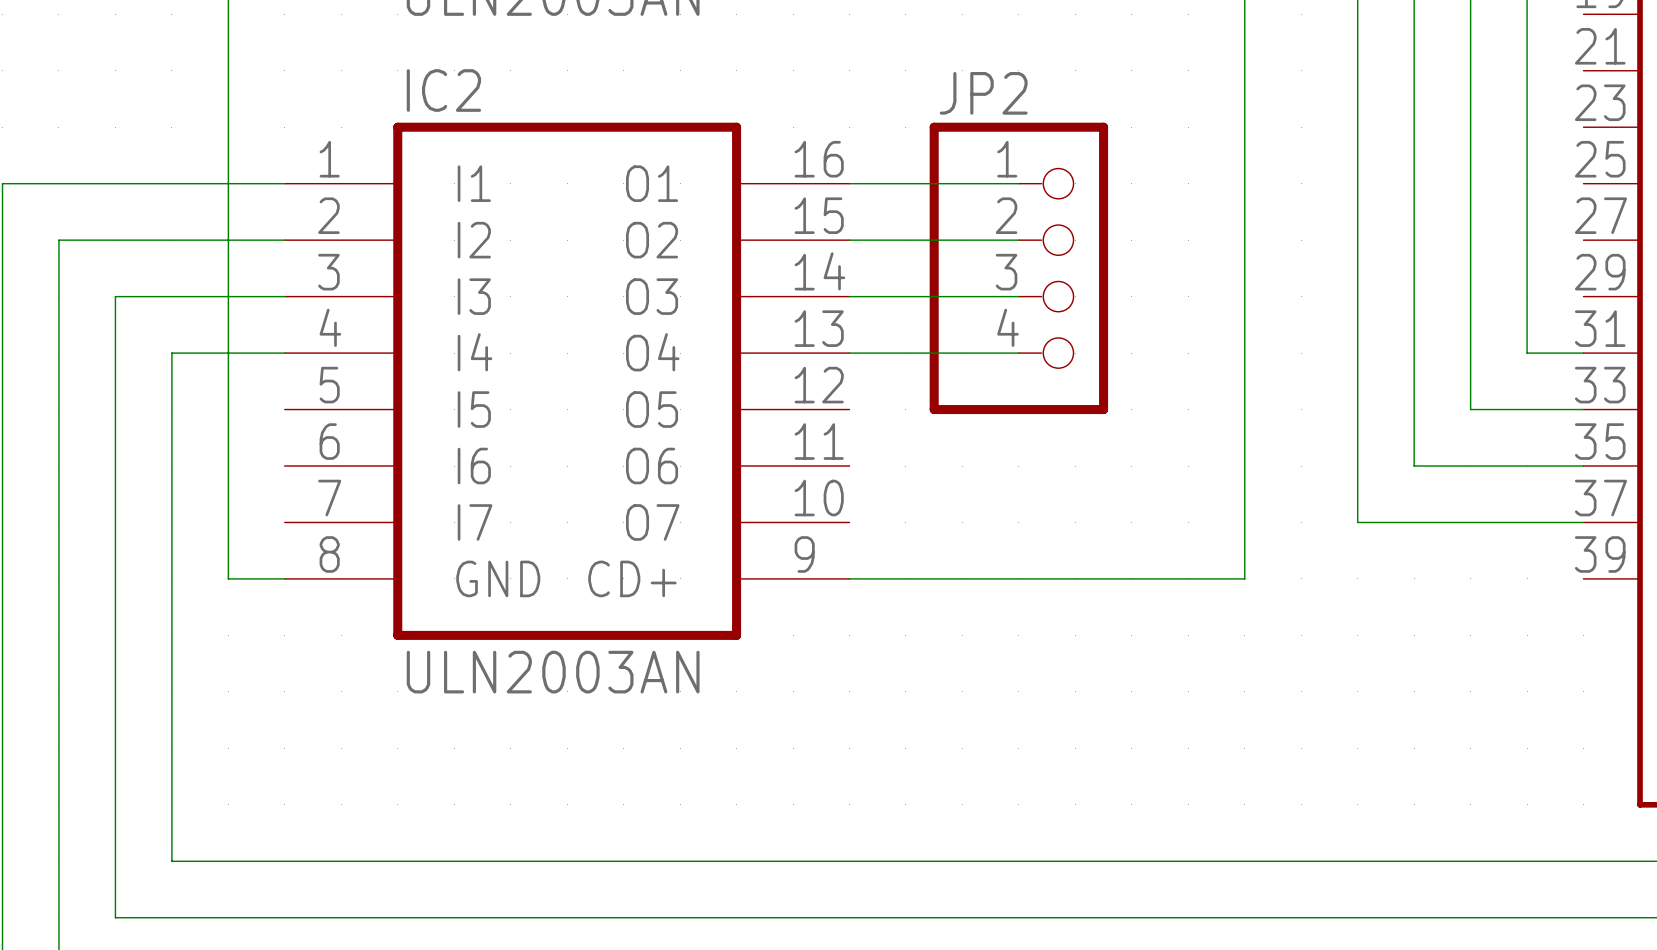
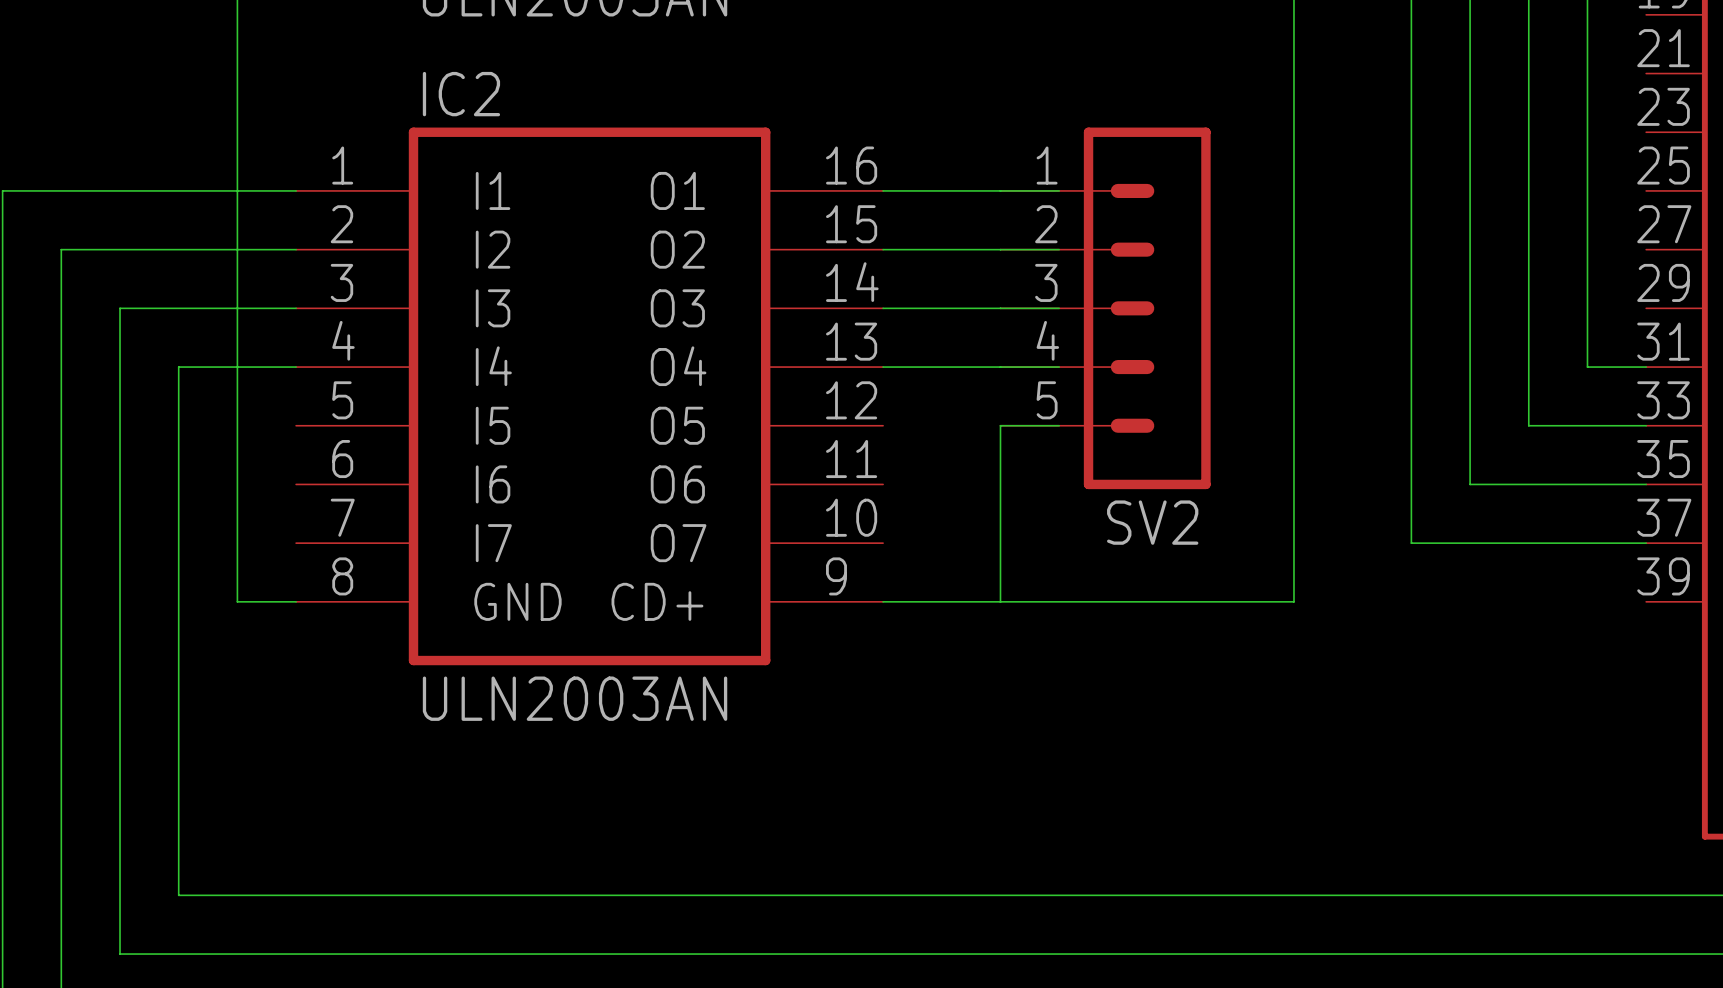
JP2: (1018, 268) -> none
SV2: none -> (1105, 308)
wire: none -> (1059, 425) (1000, 425) (1000, 601)

